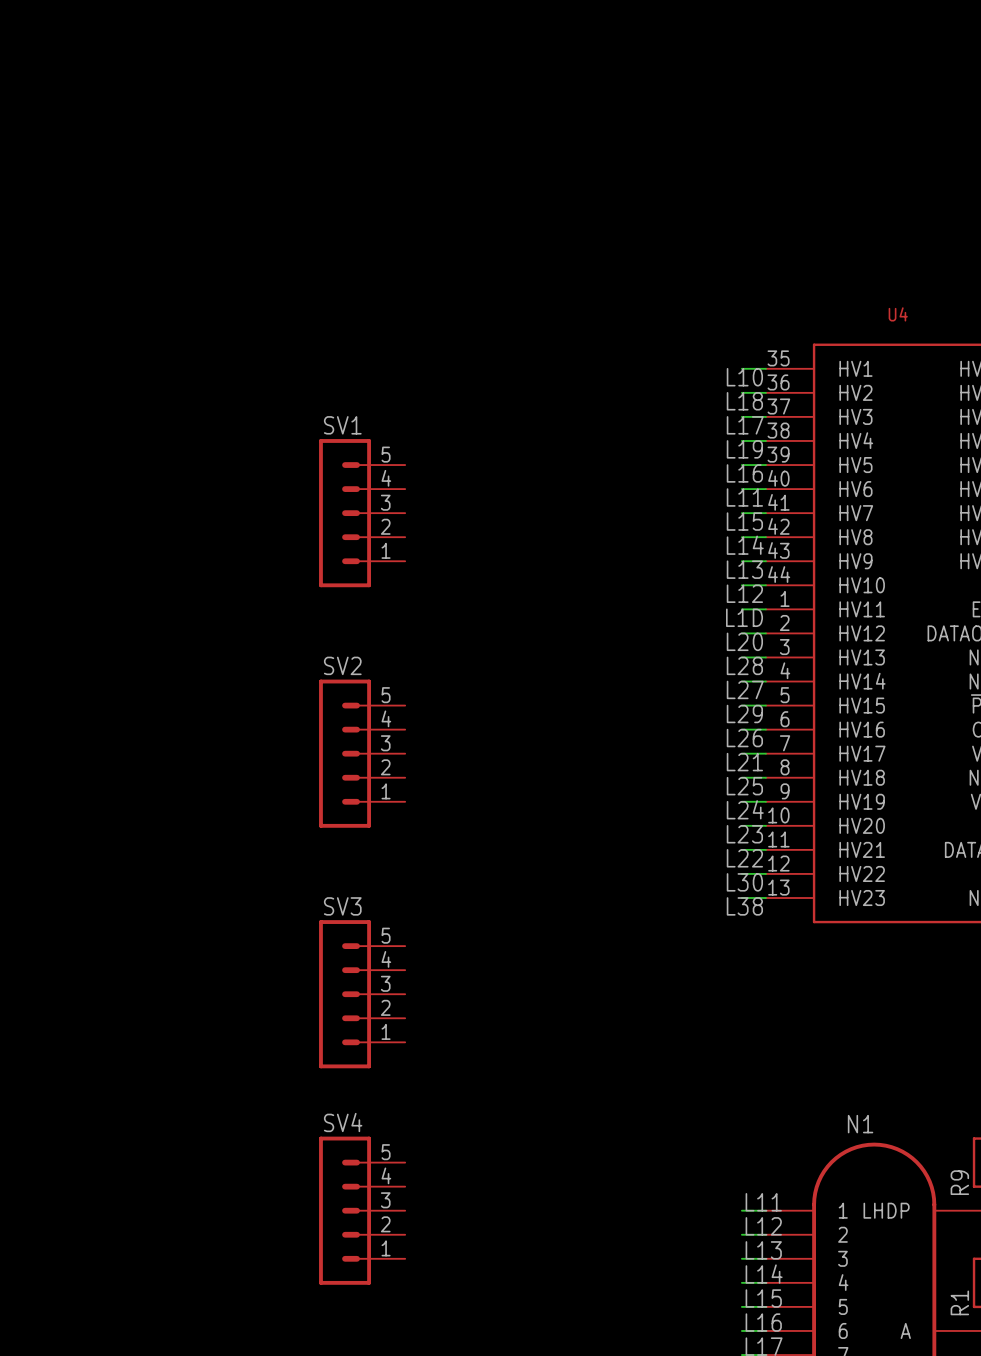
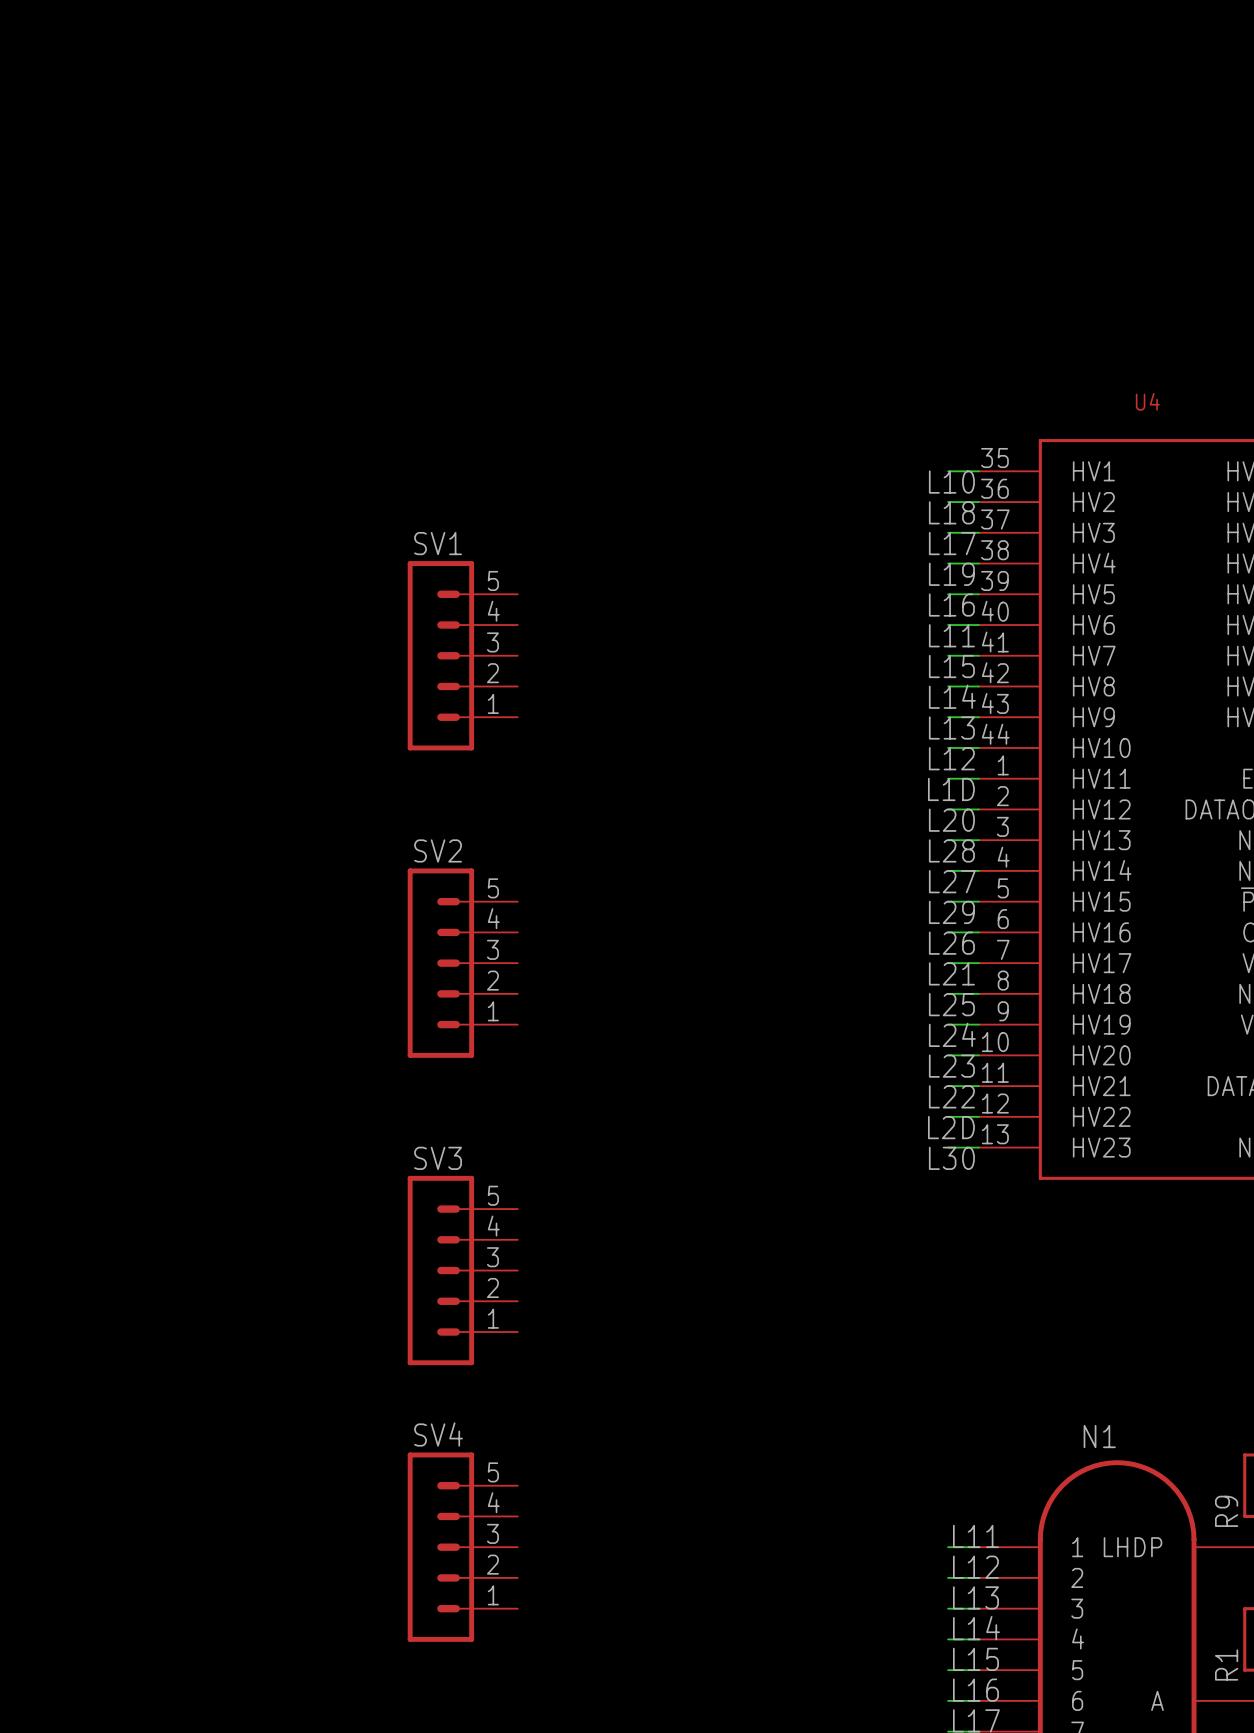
label: L30 (744, 882) -> L2D (951, 1127)
label: L38 (744, 906) -> L30 (951, 1158)

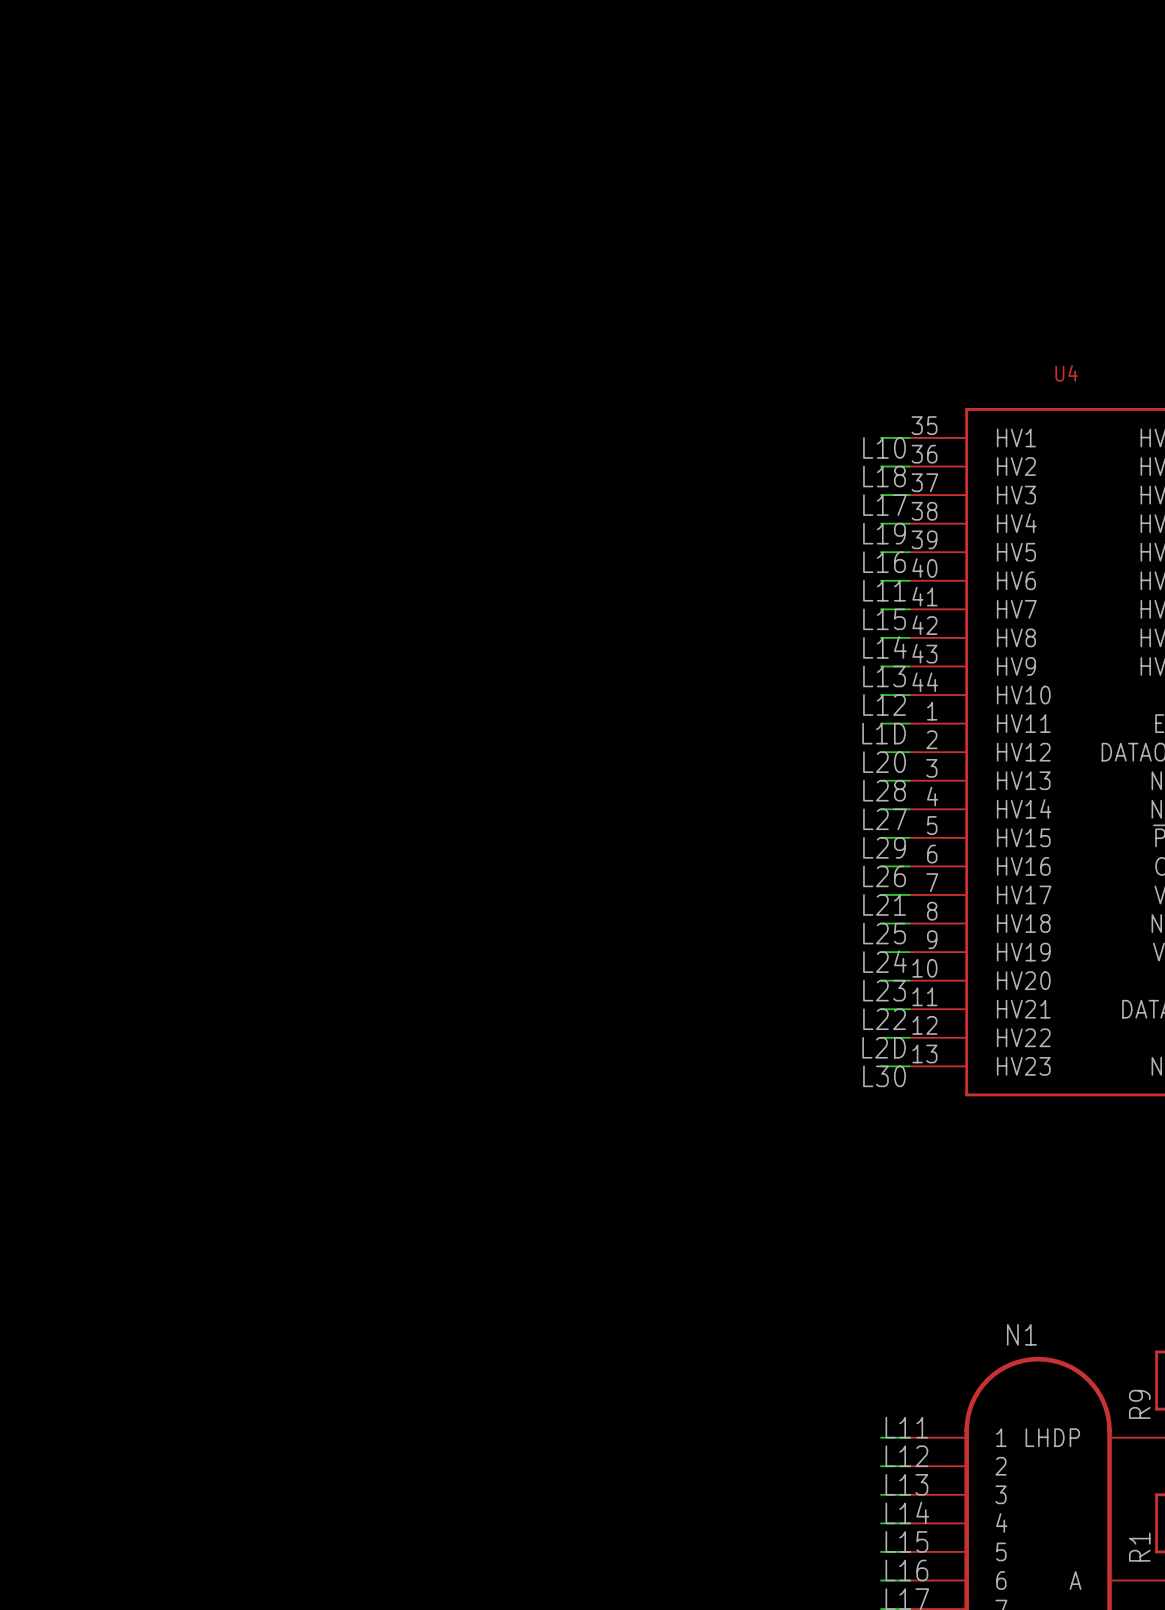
SV1: (462, 655) -> none
SV2: (462, 963) -> none
SV3: (462, 1270) -> none
SV4: (462, 1547) -> none

